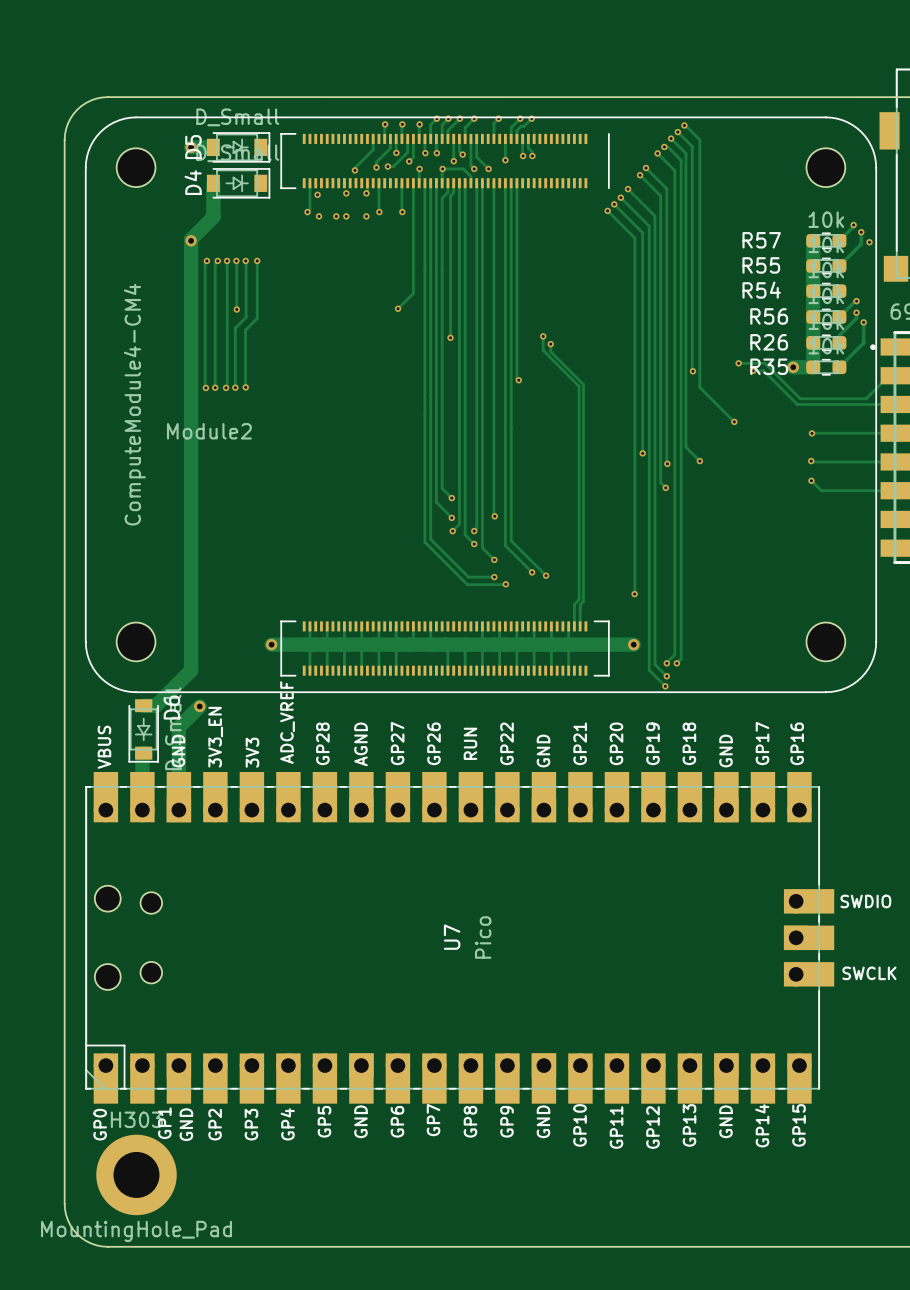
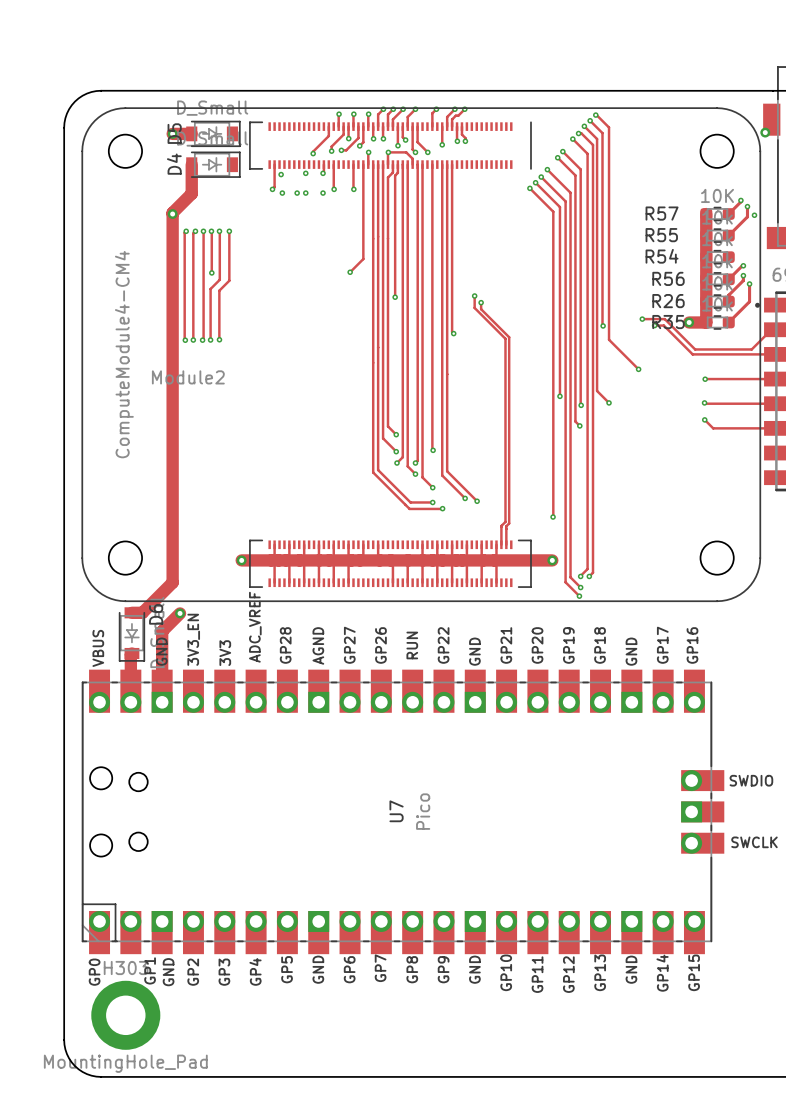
via: none -> (765, 132)
R57 value: 10k (826, 219) -> 10K (717, 195)

